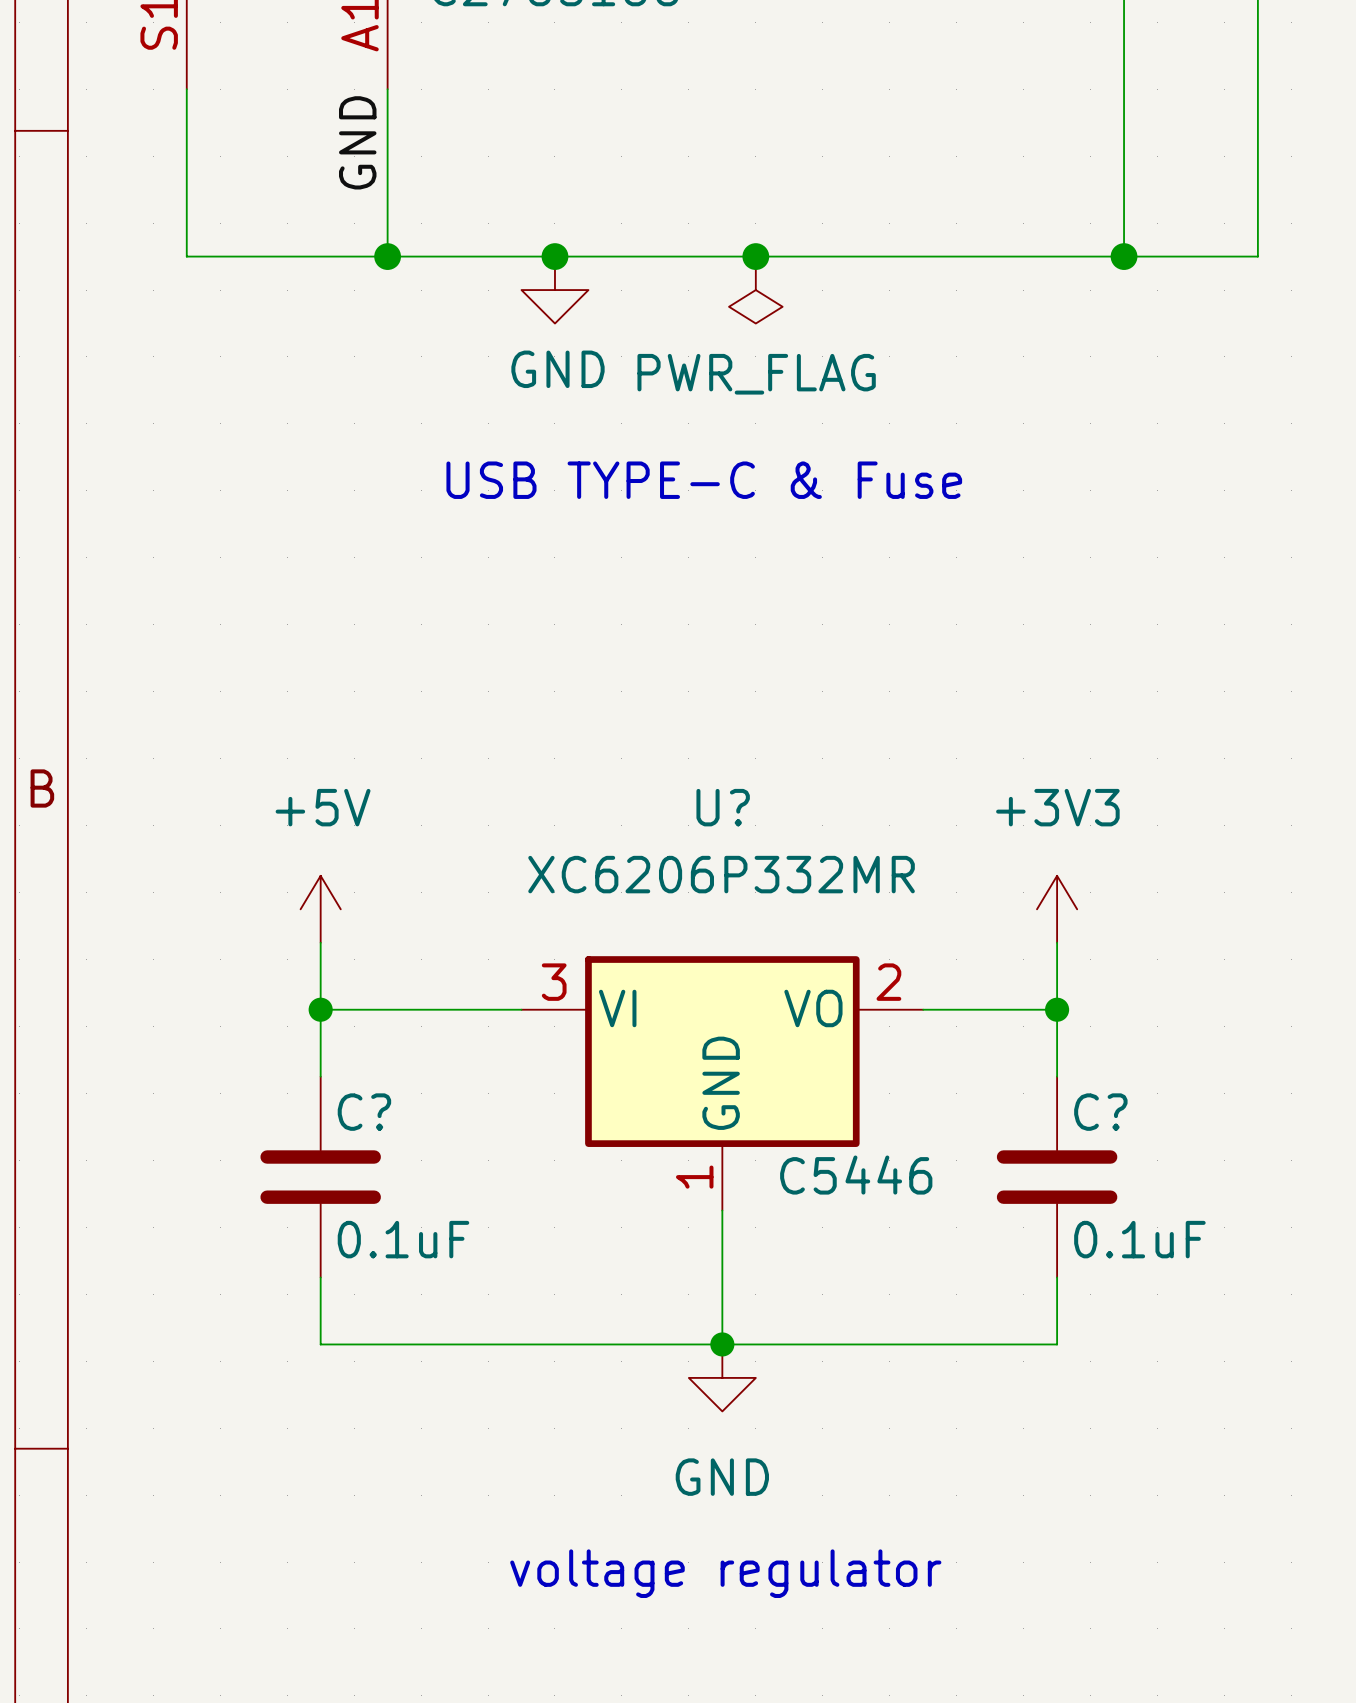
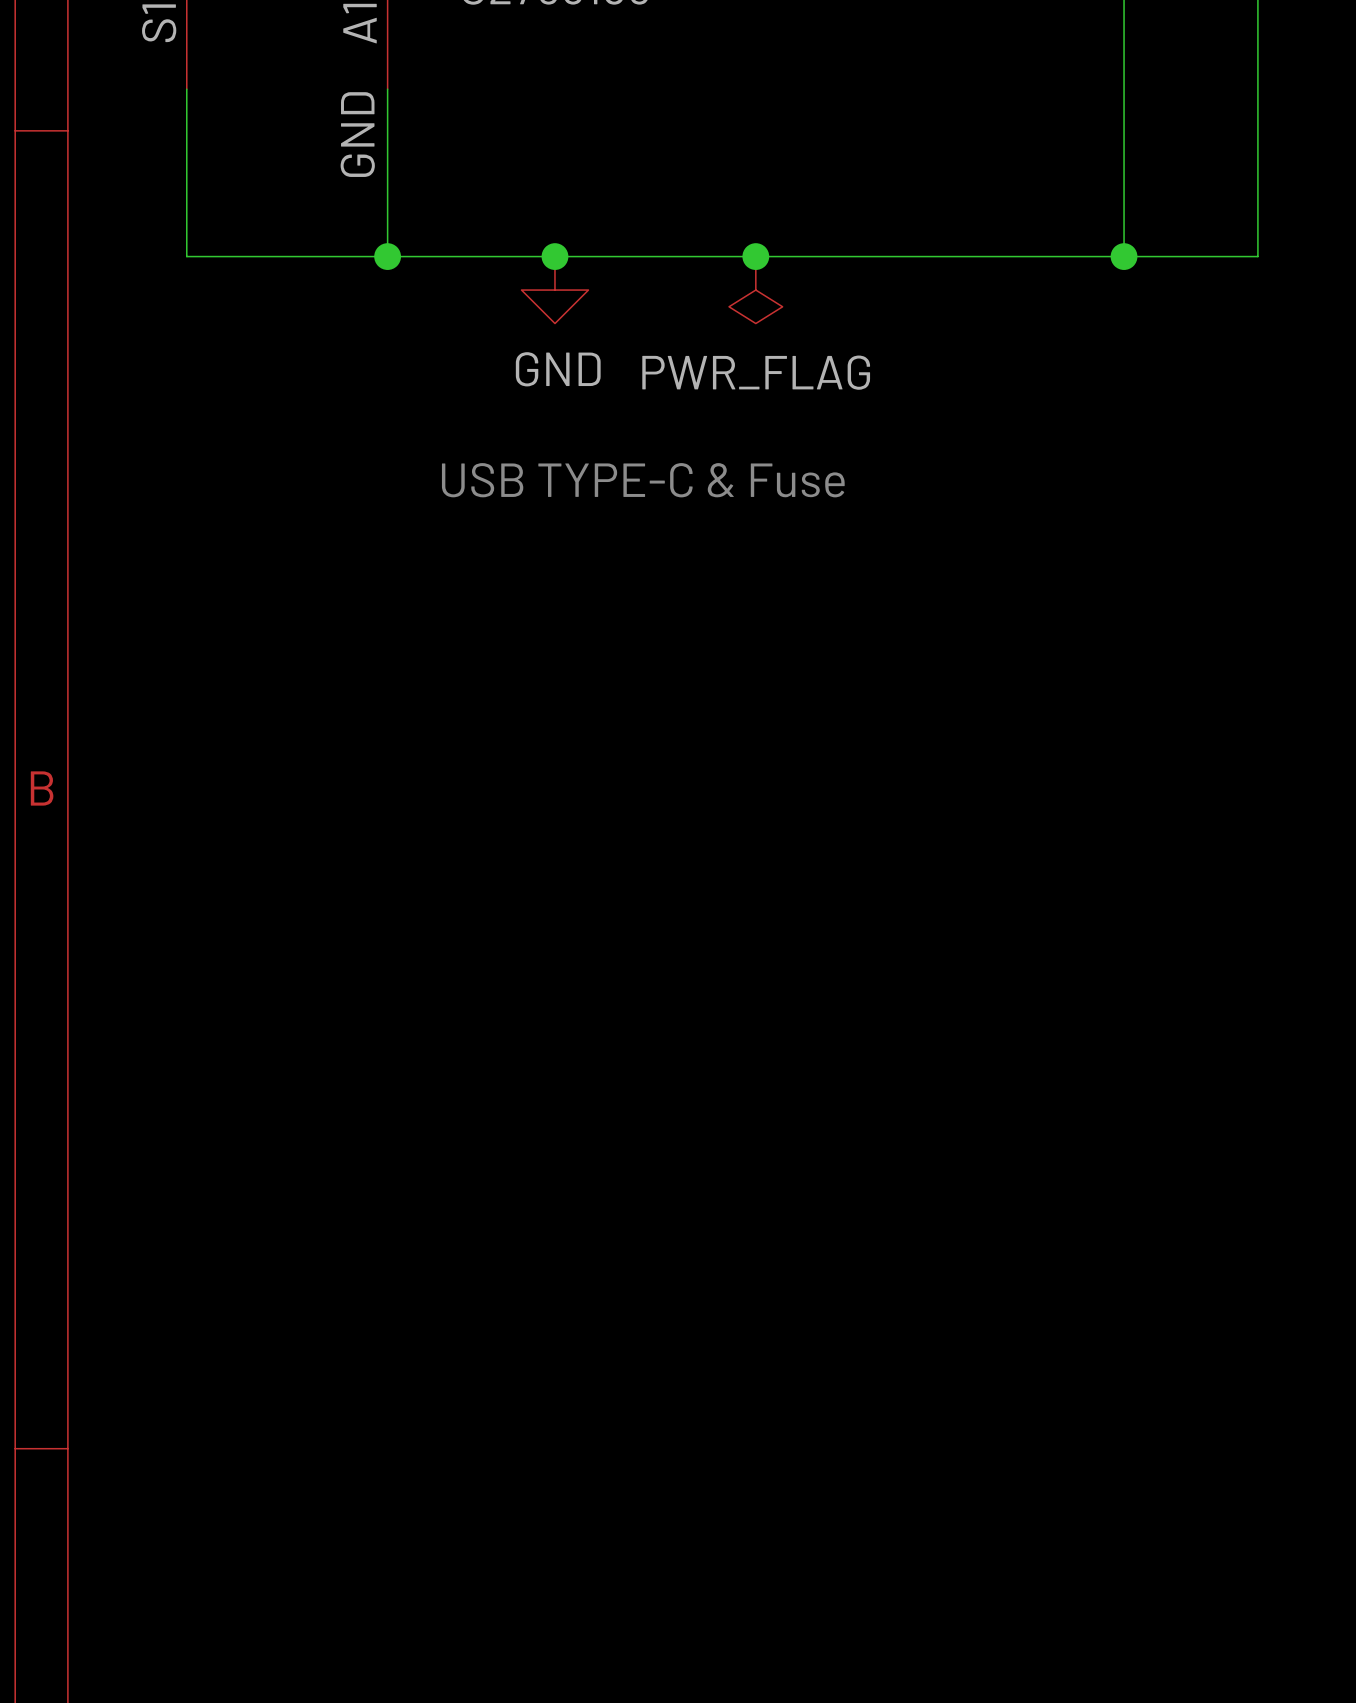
power symbol: +5V (320, 909) -> none
power symbol: +3V3 (1057, 909) -> none
wire: (320, 942) (320, 1076) -> none
wire: (1057, 942) (1057, 1076) -> none
wire: (320, 1009) (521, 1009) -> none
junction: (320, 1009) -> none
wire: (923, 1009) (1057, 1009) -> none
junction: (1057, 1009) -> none
U?: XC6206P332MR (722, 1083) -> none
C?: 0.1uF (320, 1177) -> none
C?: 0.1uF (1057, 1177) -> none
wire: (722, 1210) (722, 1344) -> none
wire: (320, 1277) (320, 1344) (1057, 1344) (1057, 1277) -> none
junction: (722, 1344) -> none
power symbol: GND (722, 1377) -> none
text: voltage regulator (725, 1573) -> none

